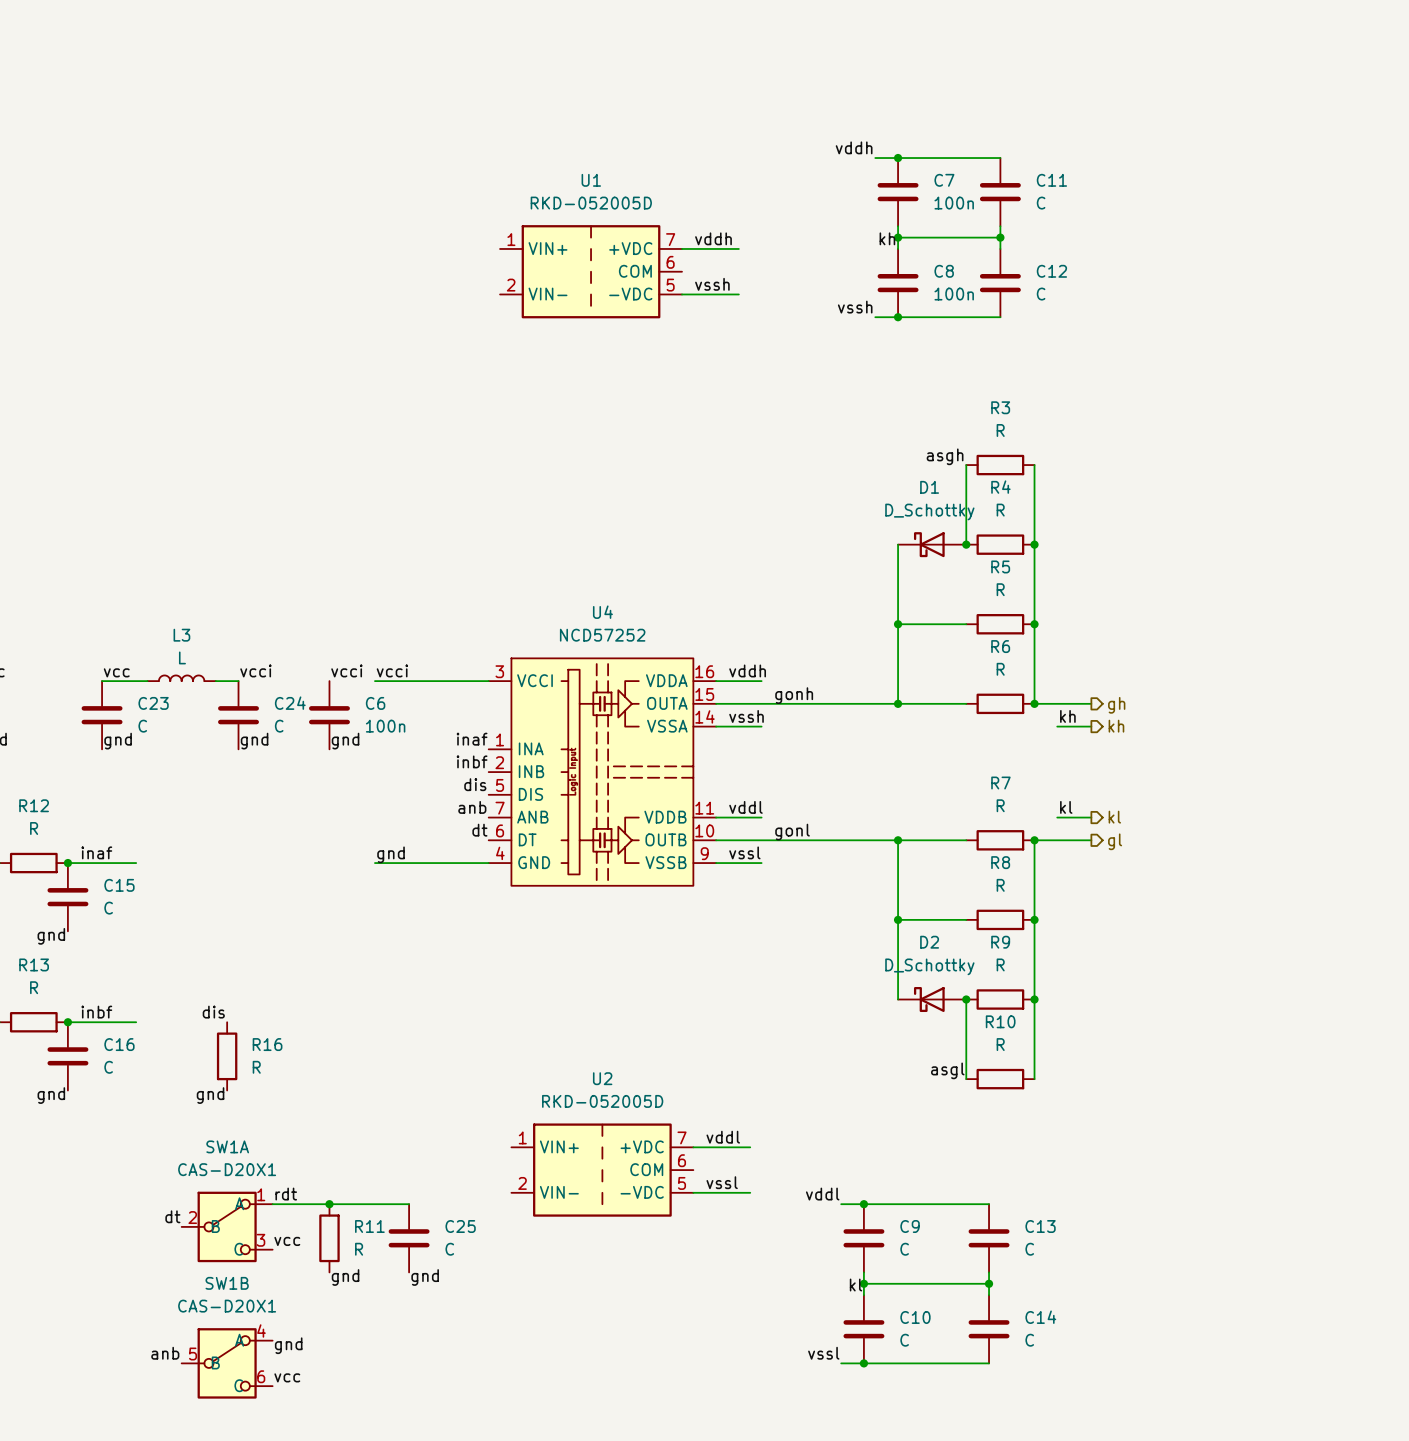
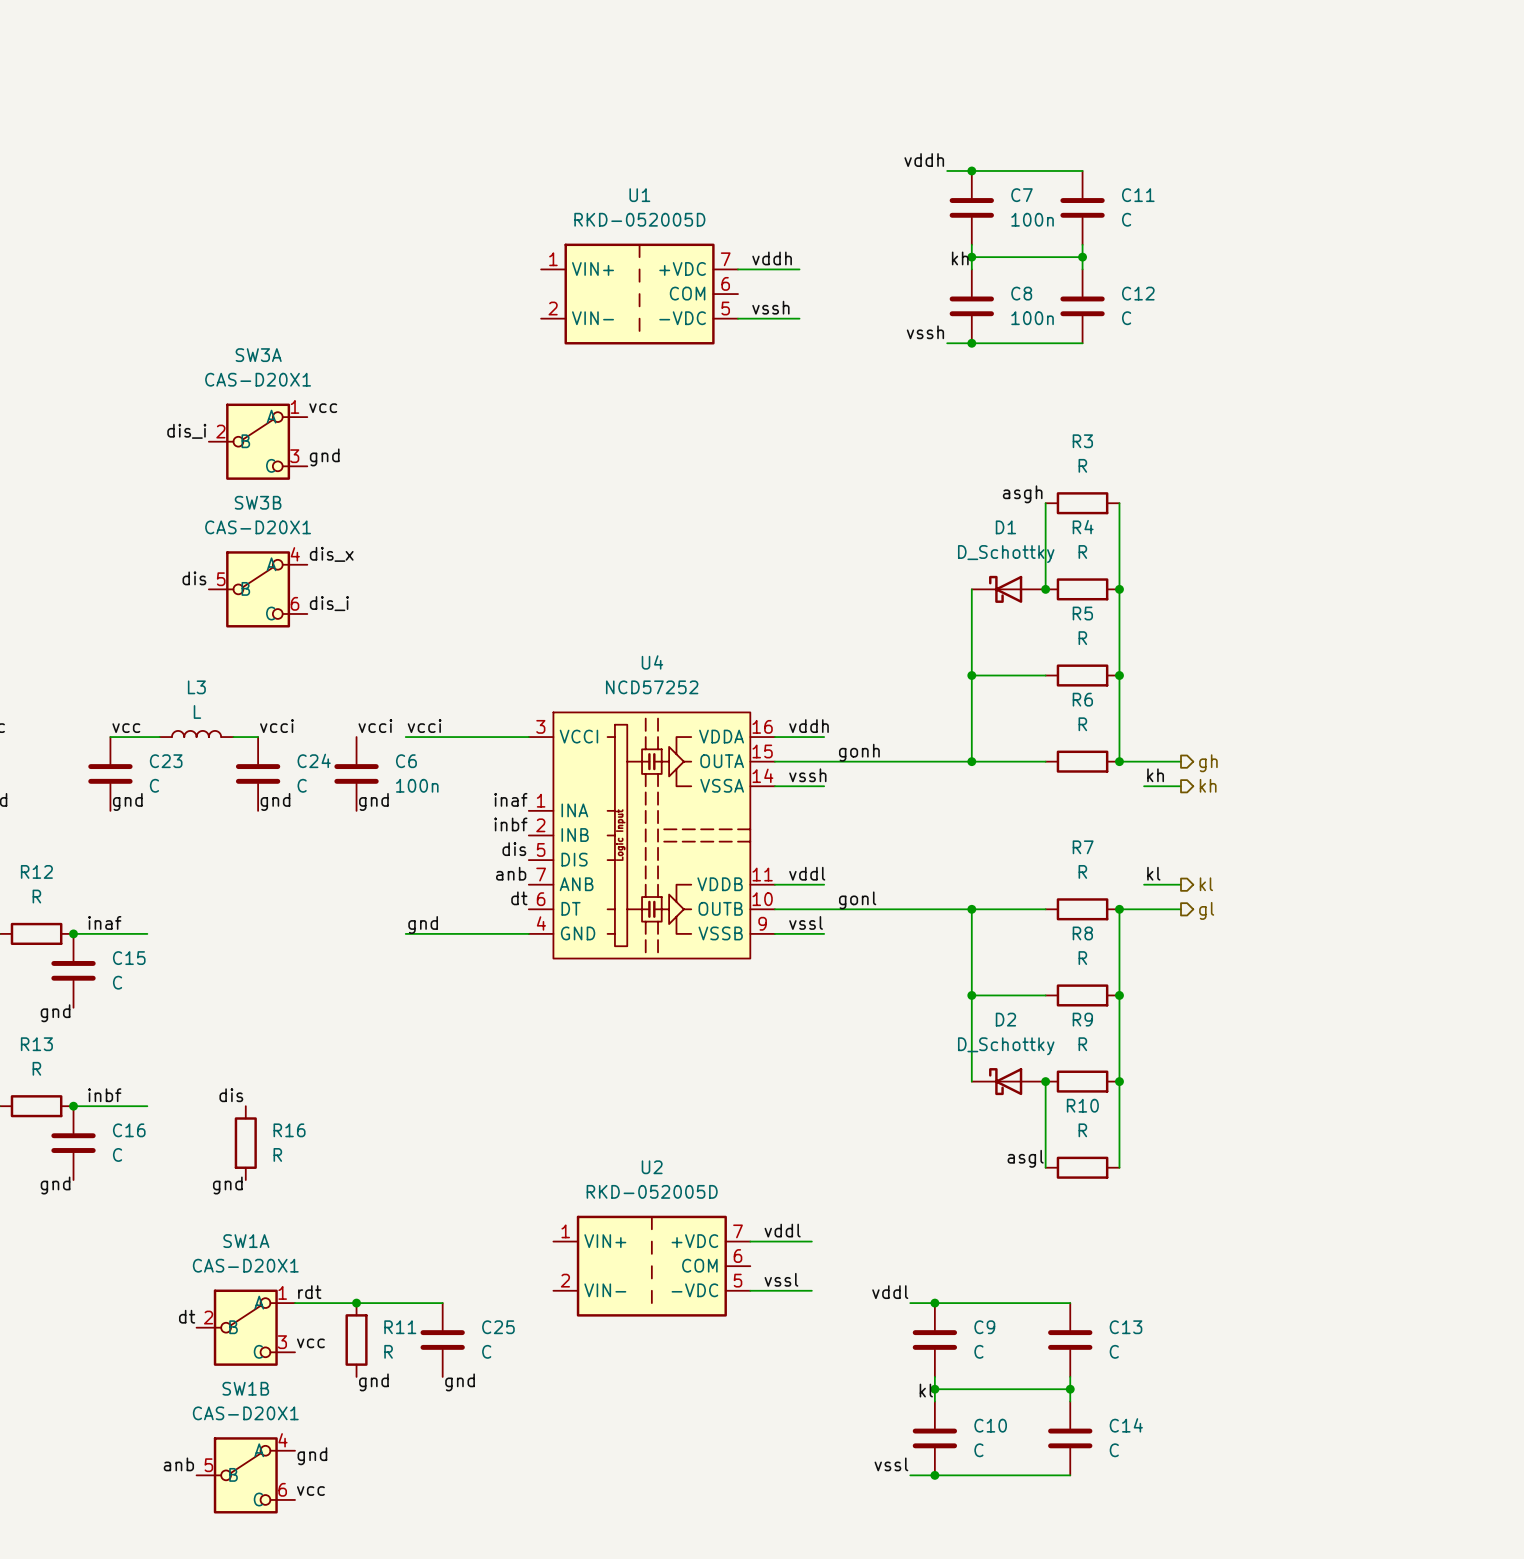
label: none -> vcc (323, 408)
label: none -> dis_i (186, 431)
SW3A: none -> CAS-D20X1 (258, 441)
label: none -> gnd (324, 457)
label: none -> dis_x (331, 554)
label: none -> dis (194, 578)
SW3B: none -> CAS-D20X1 (258, 589)
label: none -> dis_i (329, 603)

